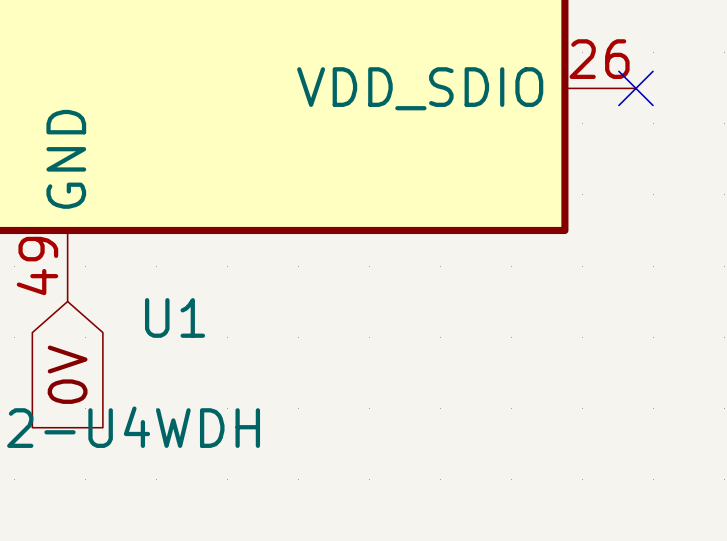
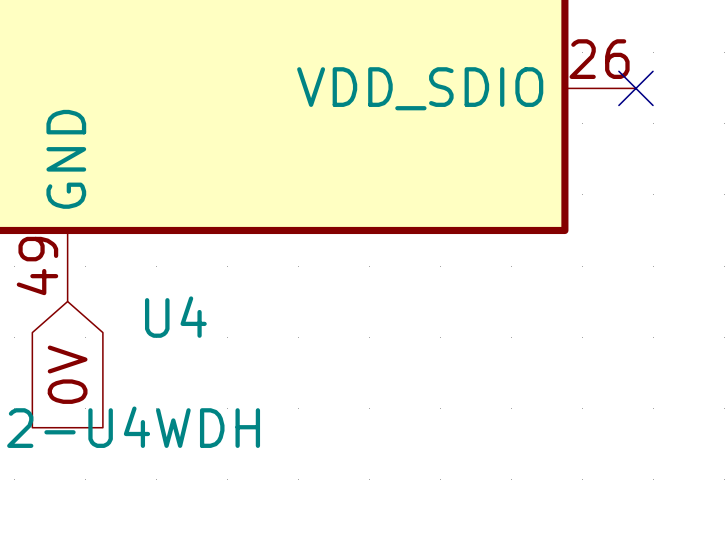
U1 name: U1 (175, 317) -> U4 (175, 317)

